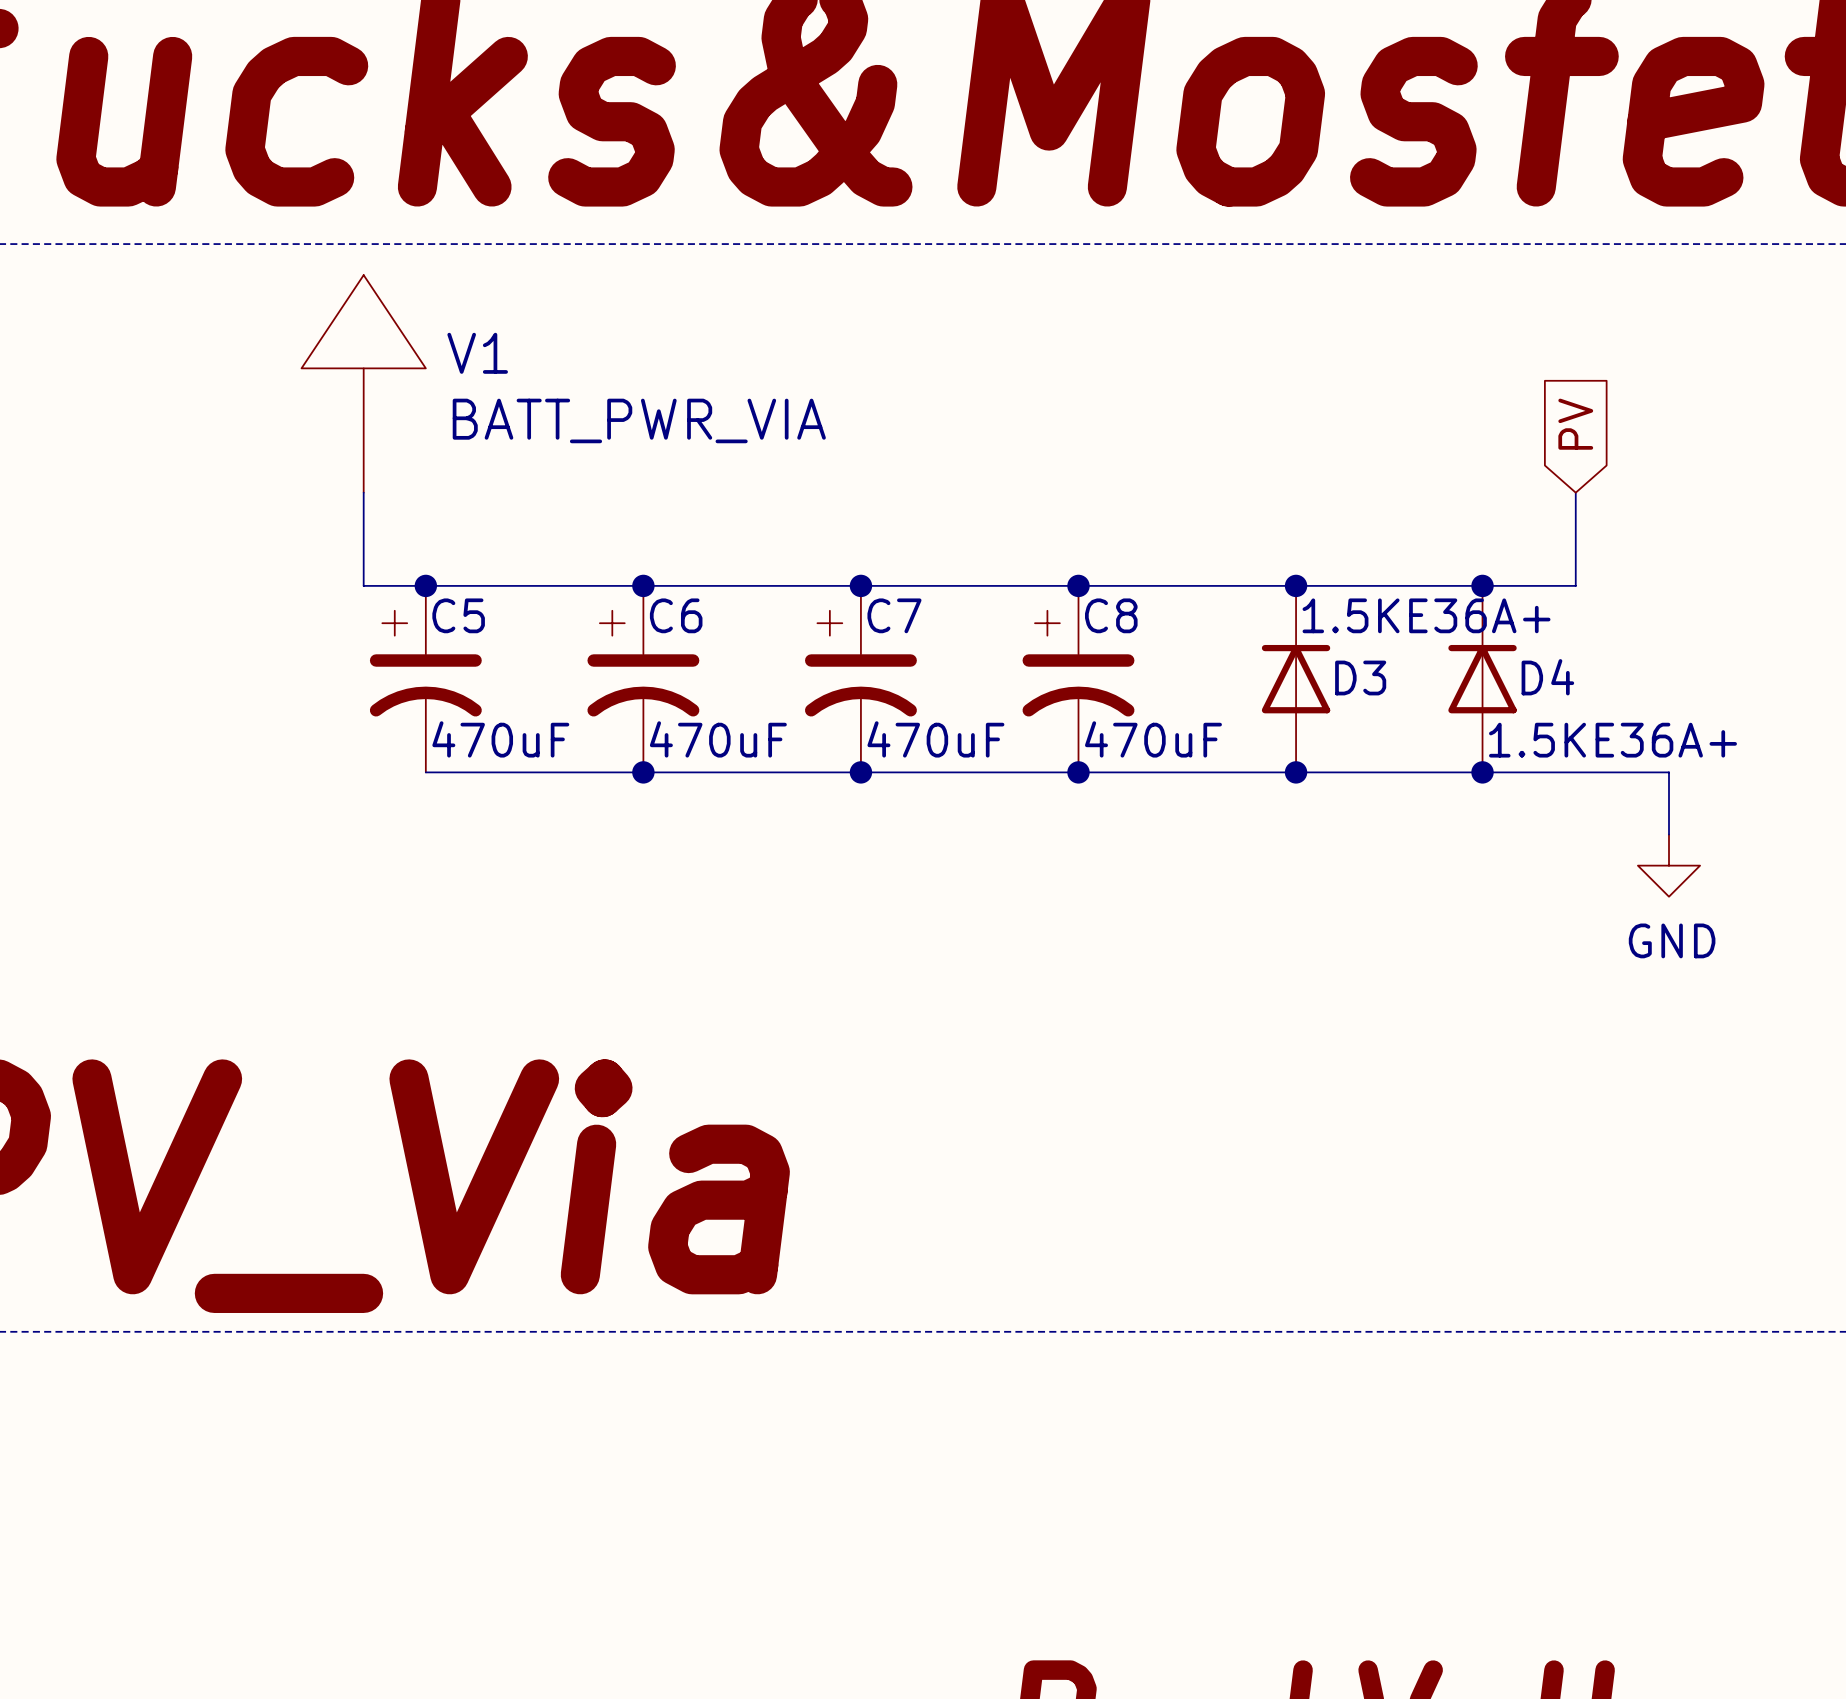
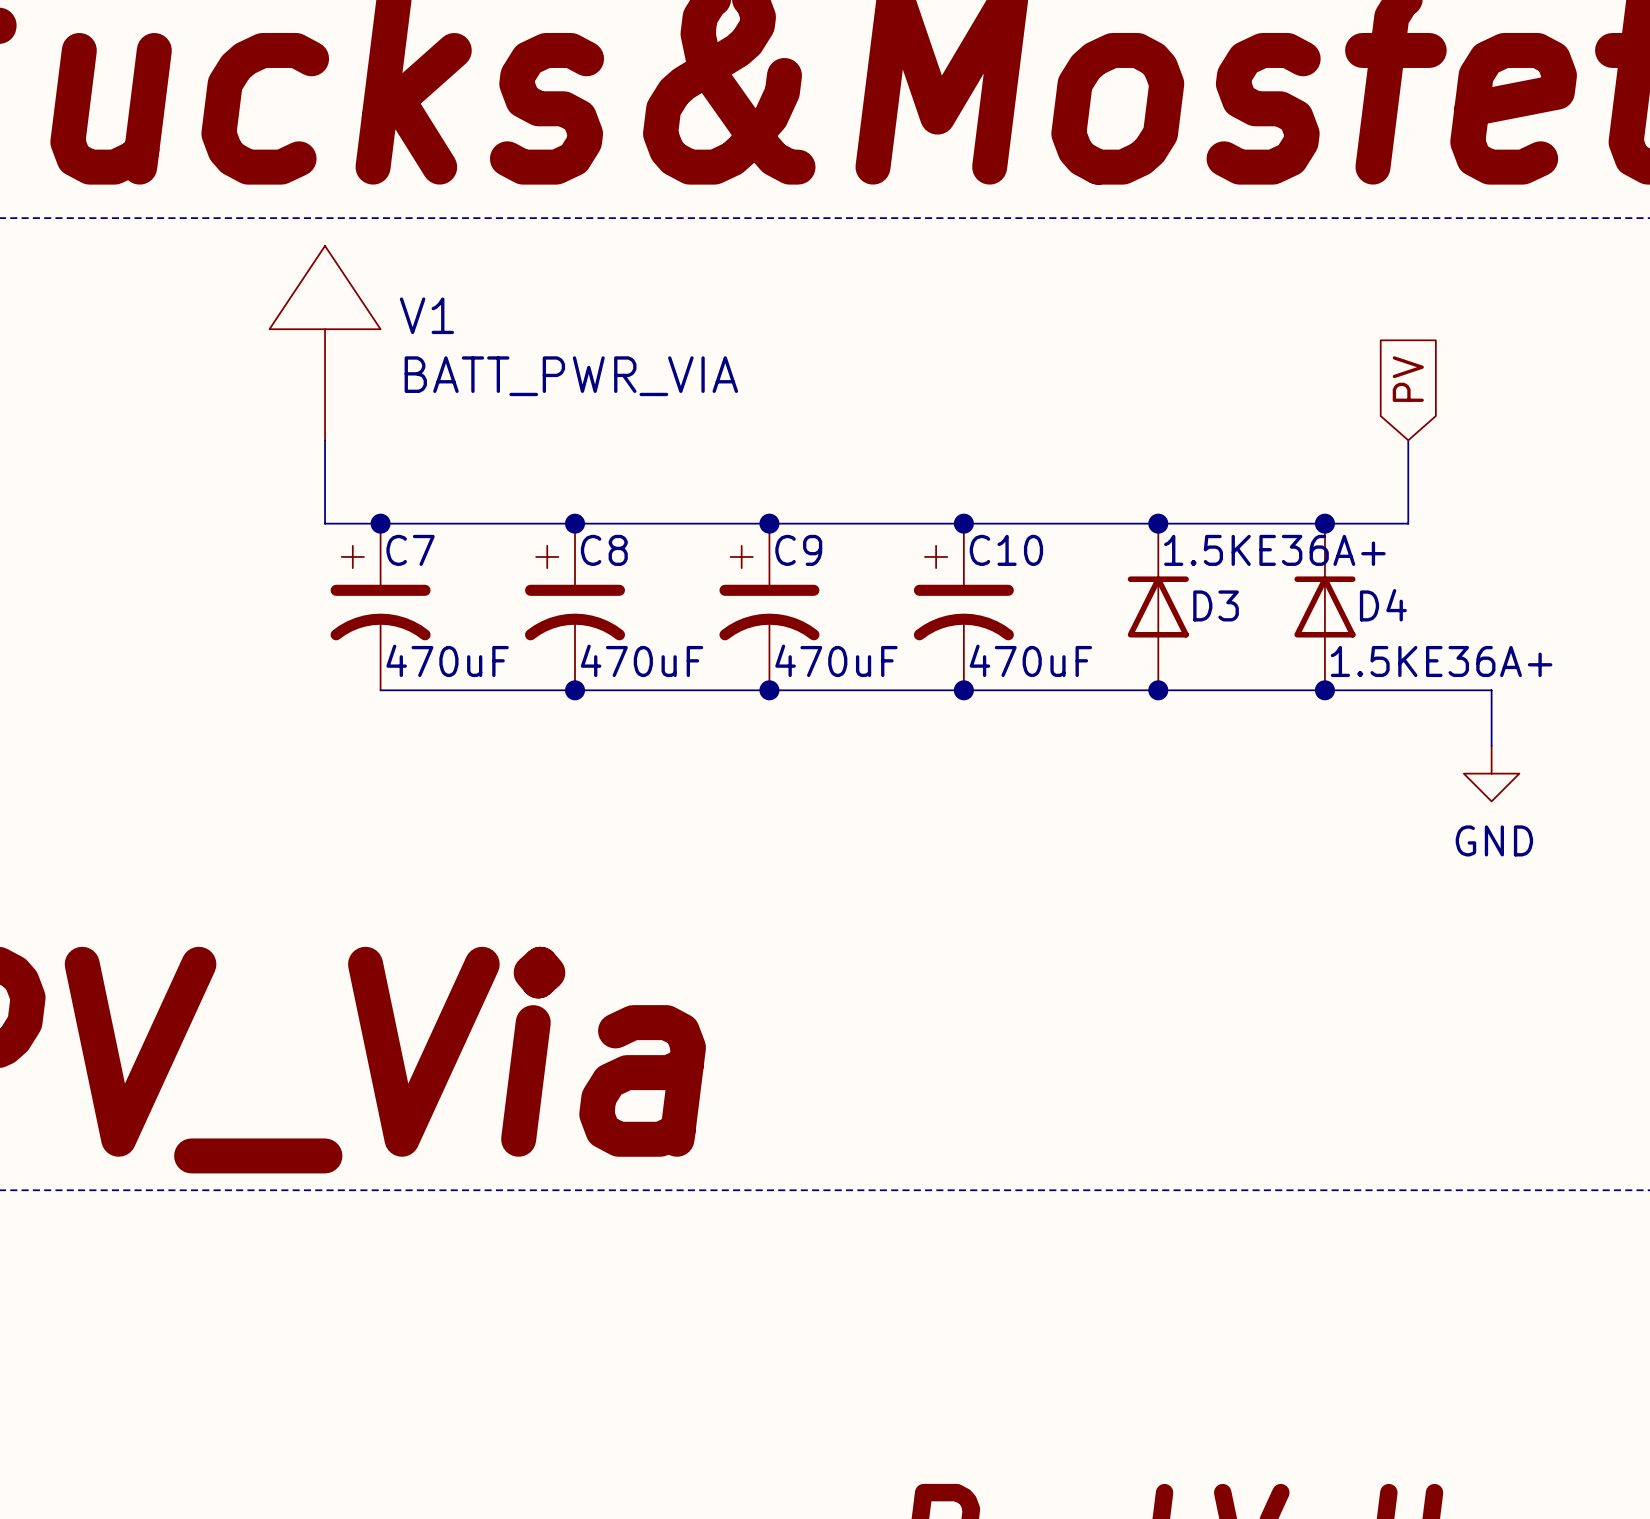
C5 name: C5 (458, 615) -> C7 (410, 550)
C6 name: C6 (676, 615) -> C8 (604, 550)
C7 name: C7 (894, 615) -> C9 (798, 550)
C8 name: C8 (1111, 615) -> C10 (1006, 550)

